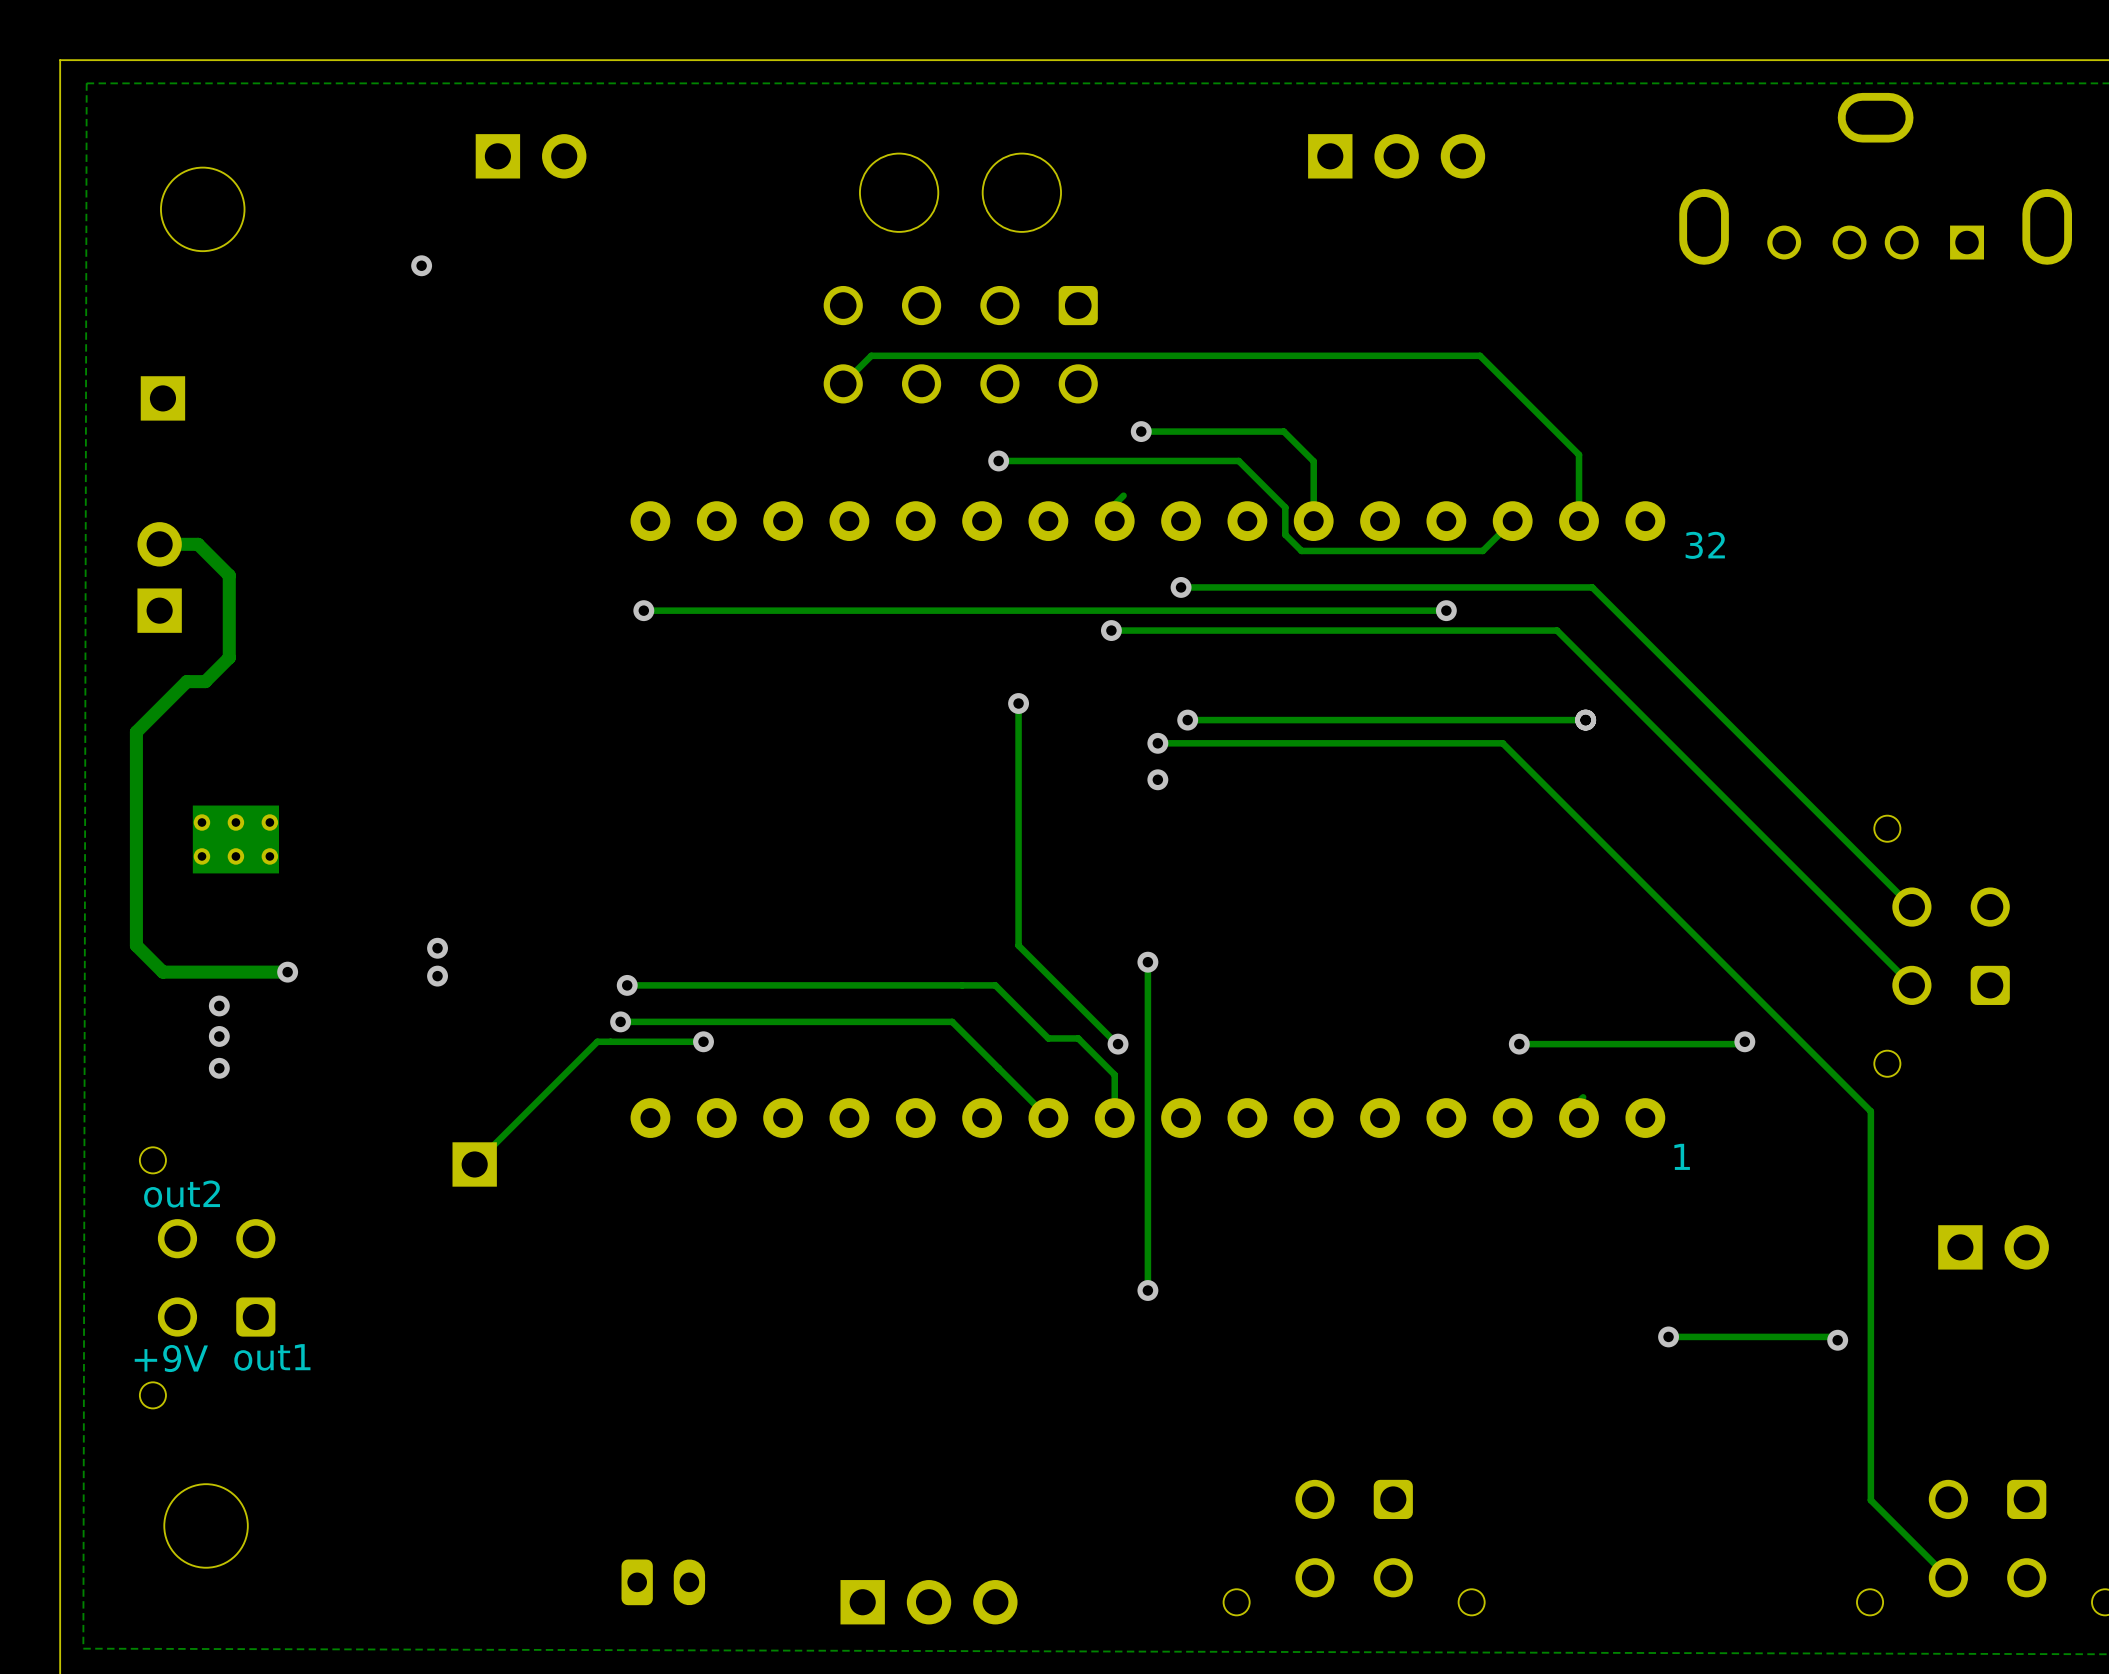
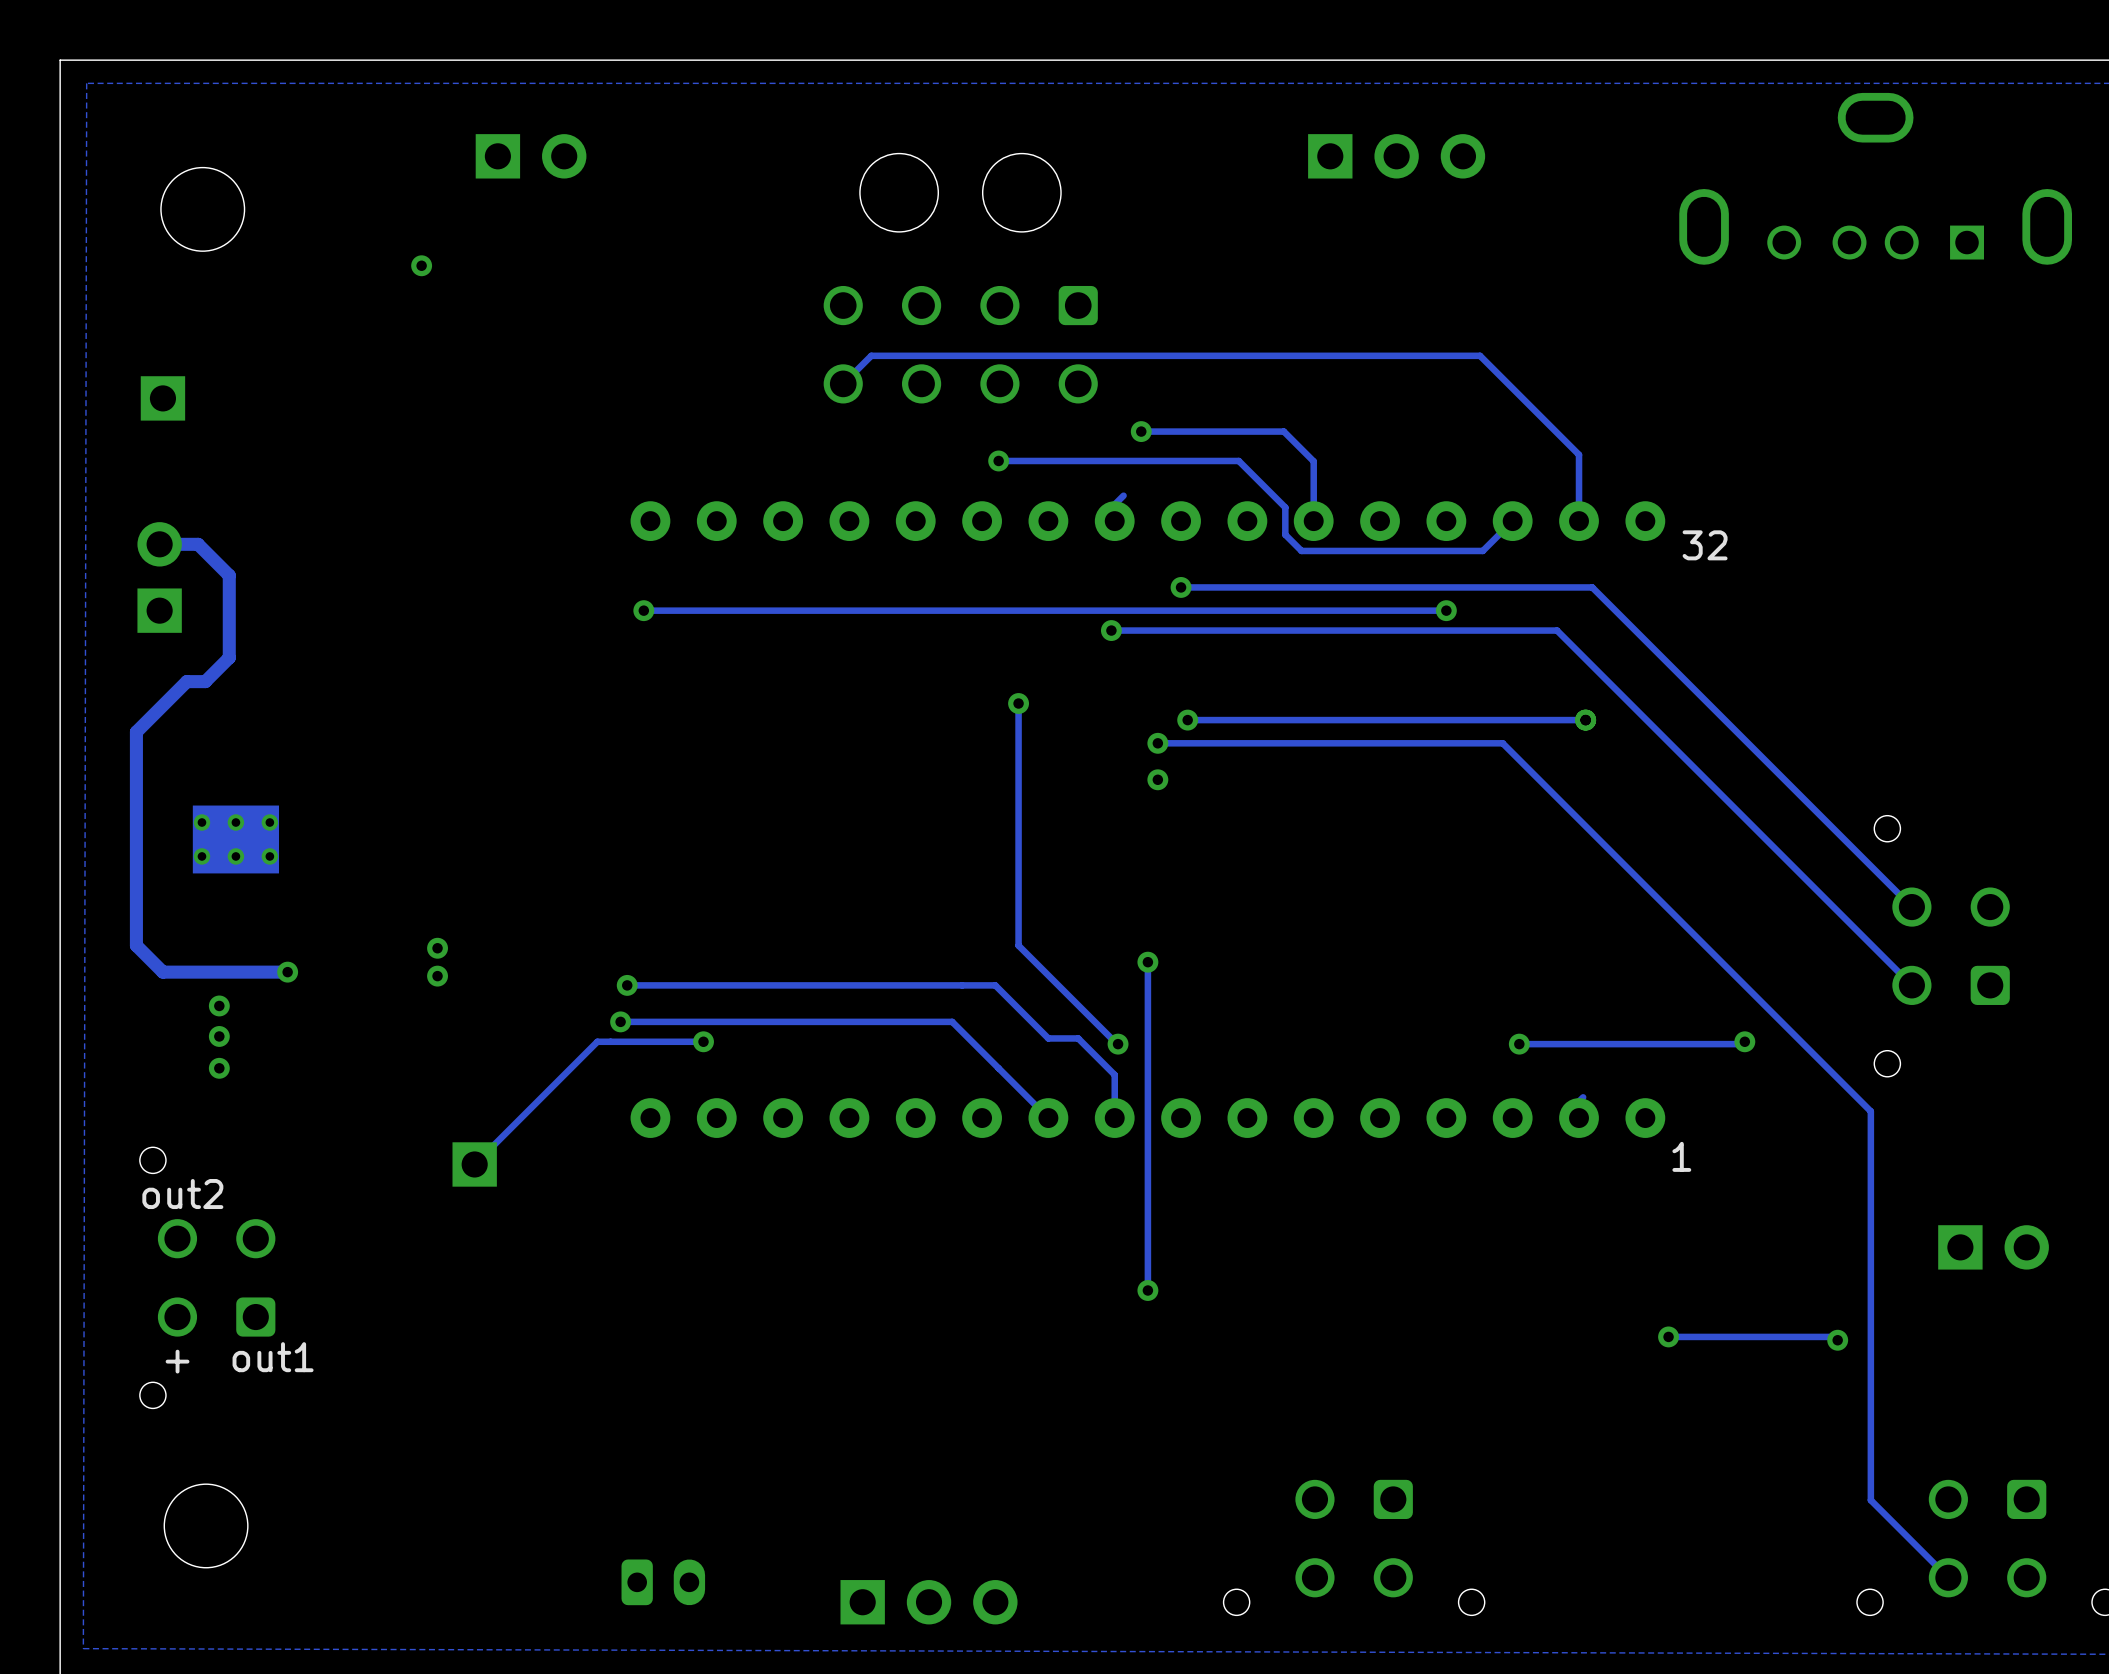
text: +9V (171, 1358) -> + (177, 1361)

